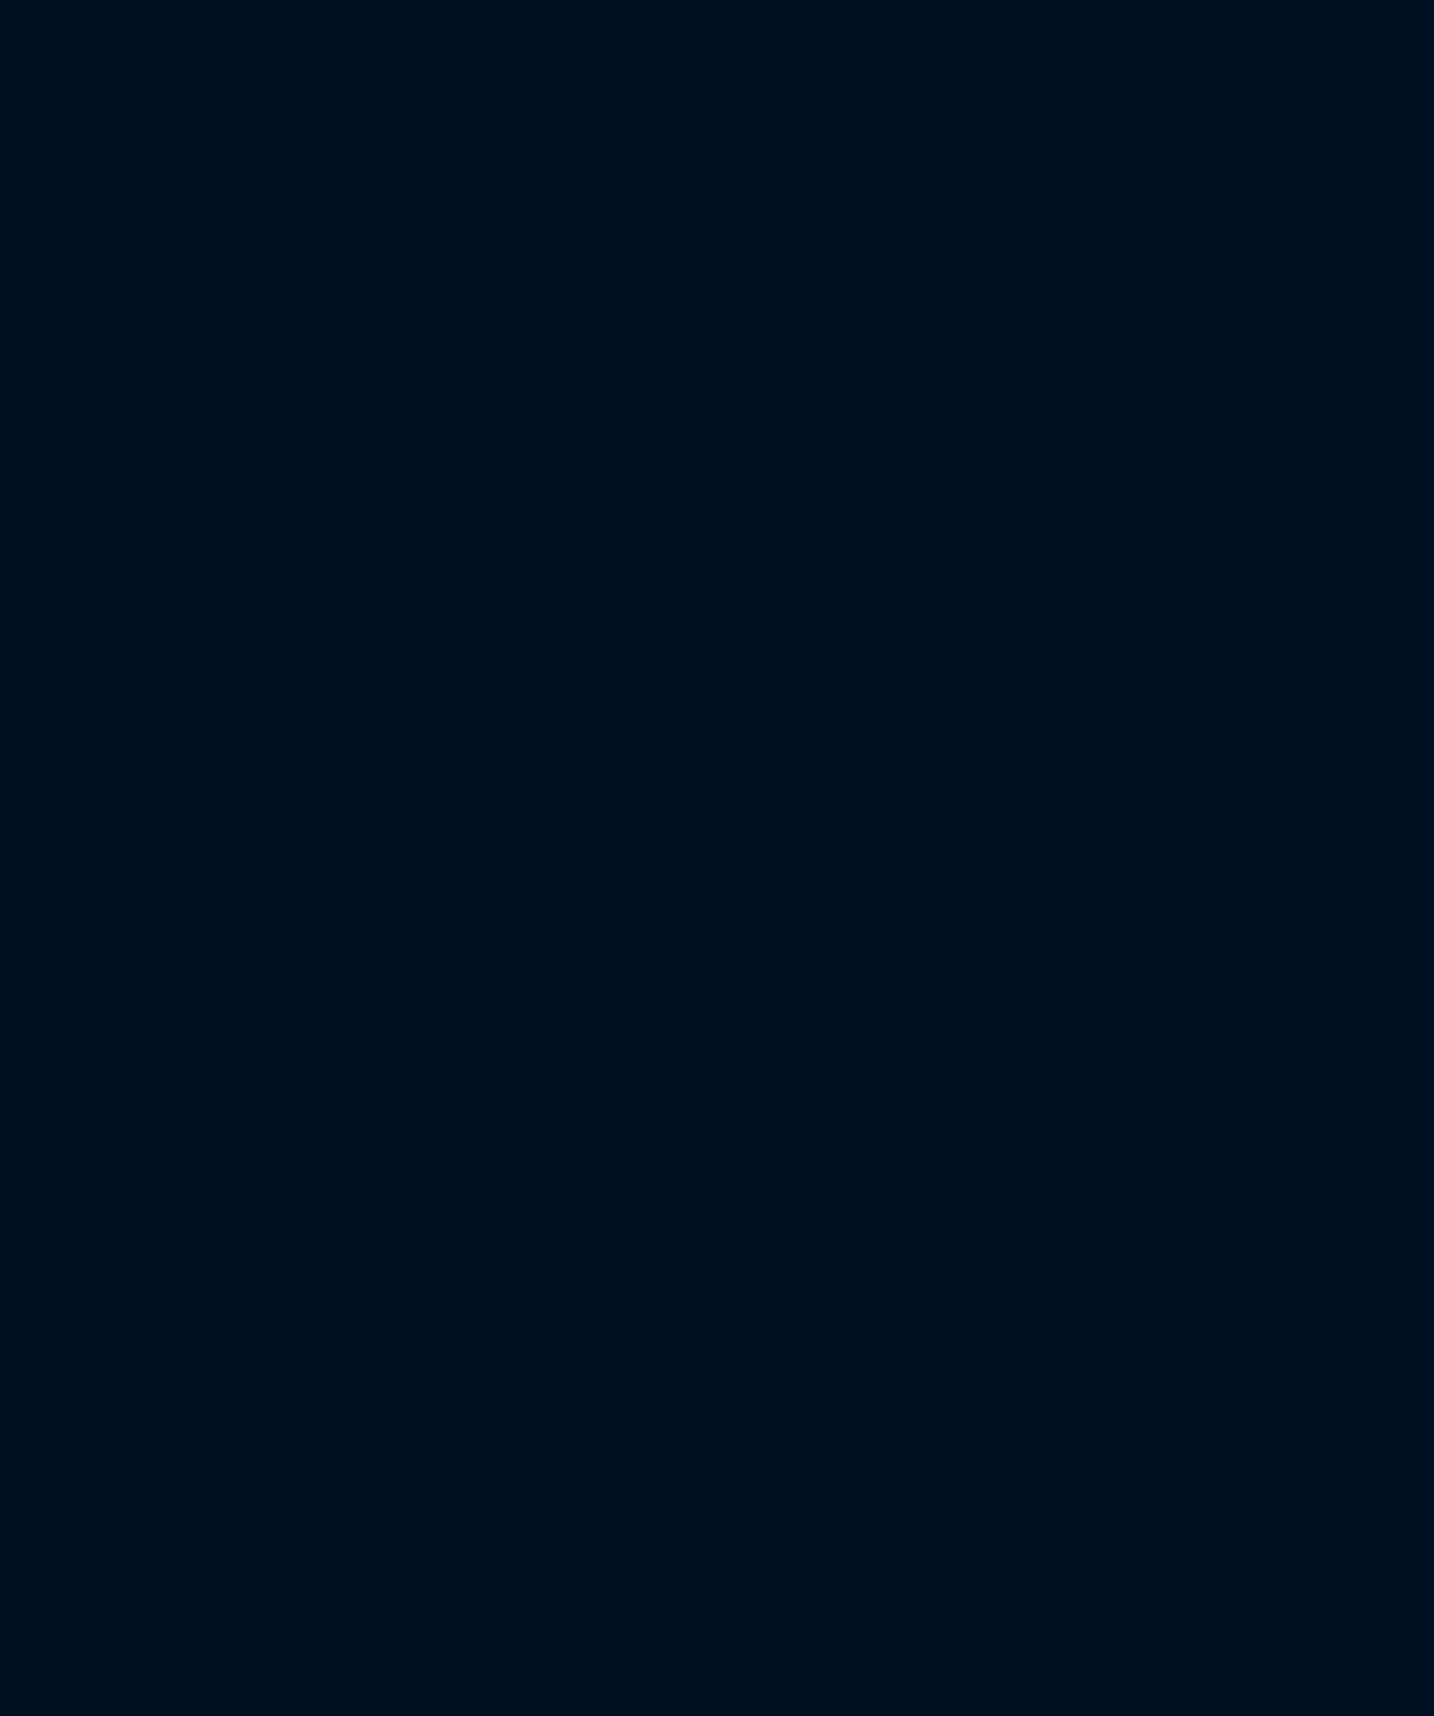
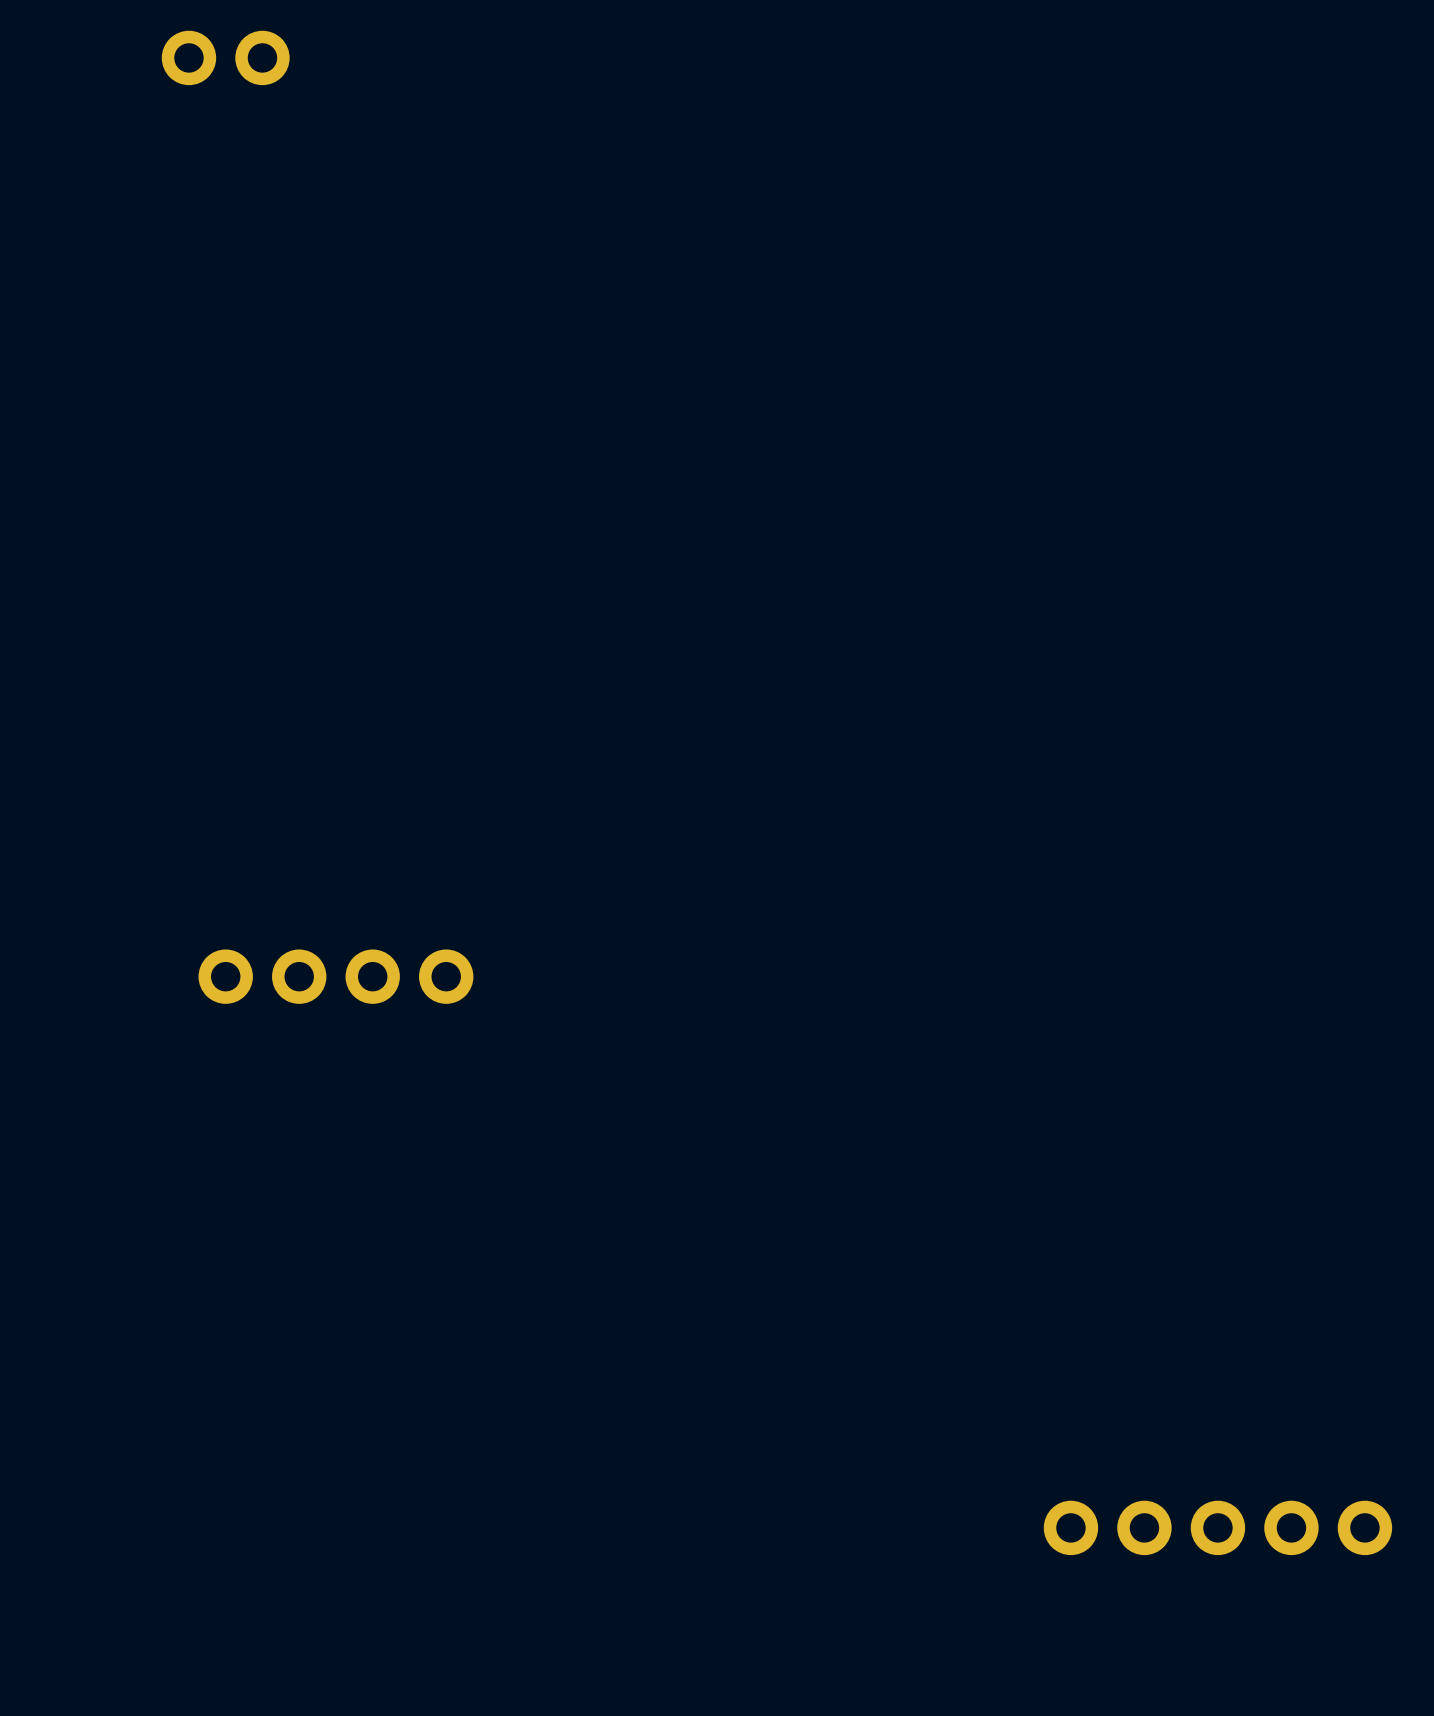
part: none -> (225, 57)
part: none -> (335, 976)
part: none -> (1217, 1527)

